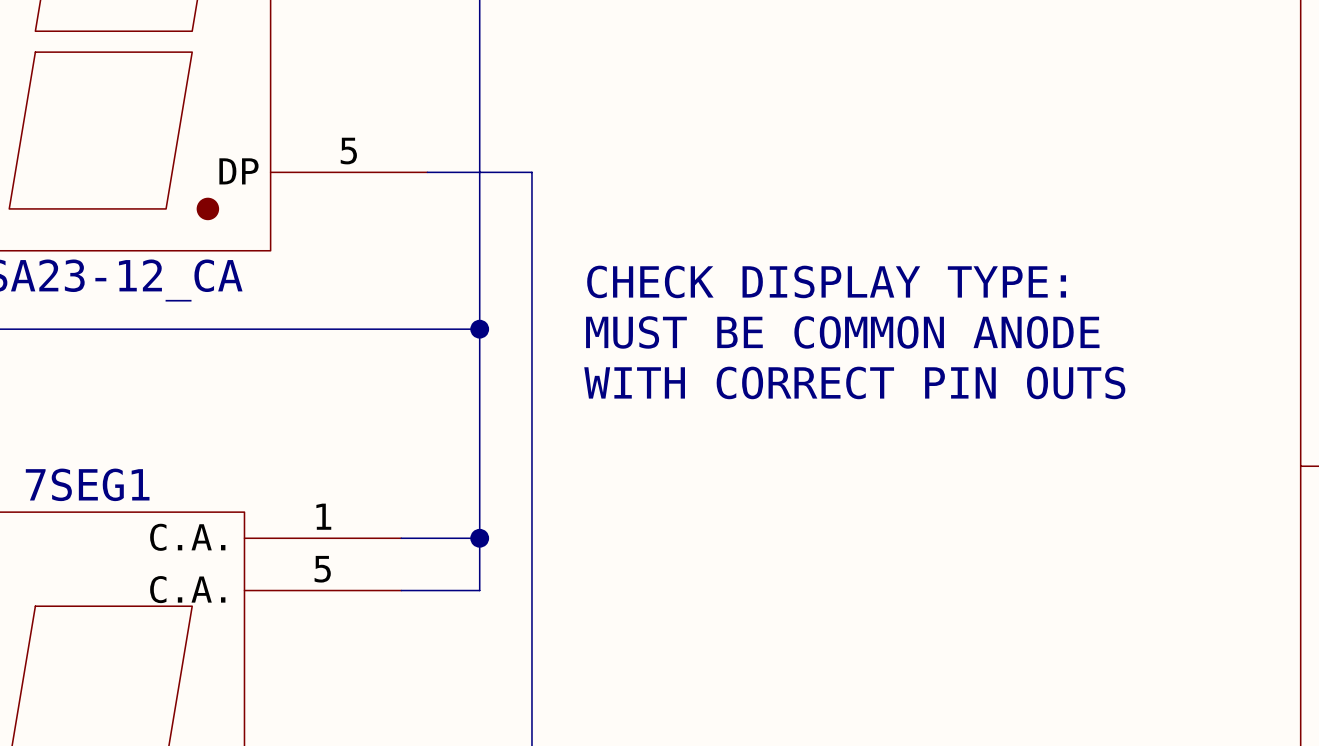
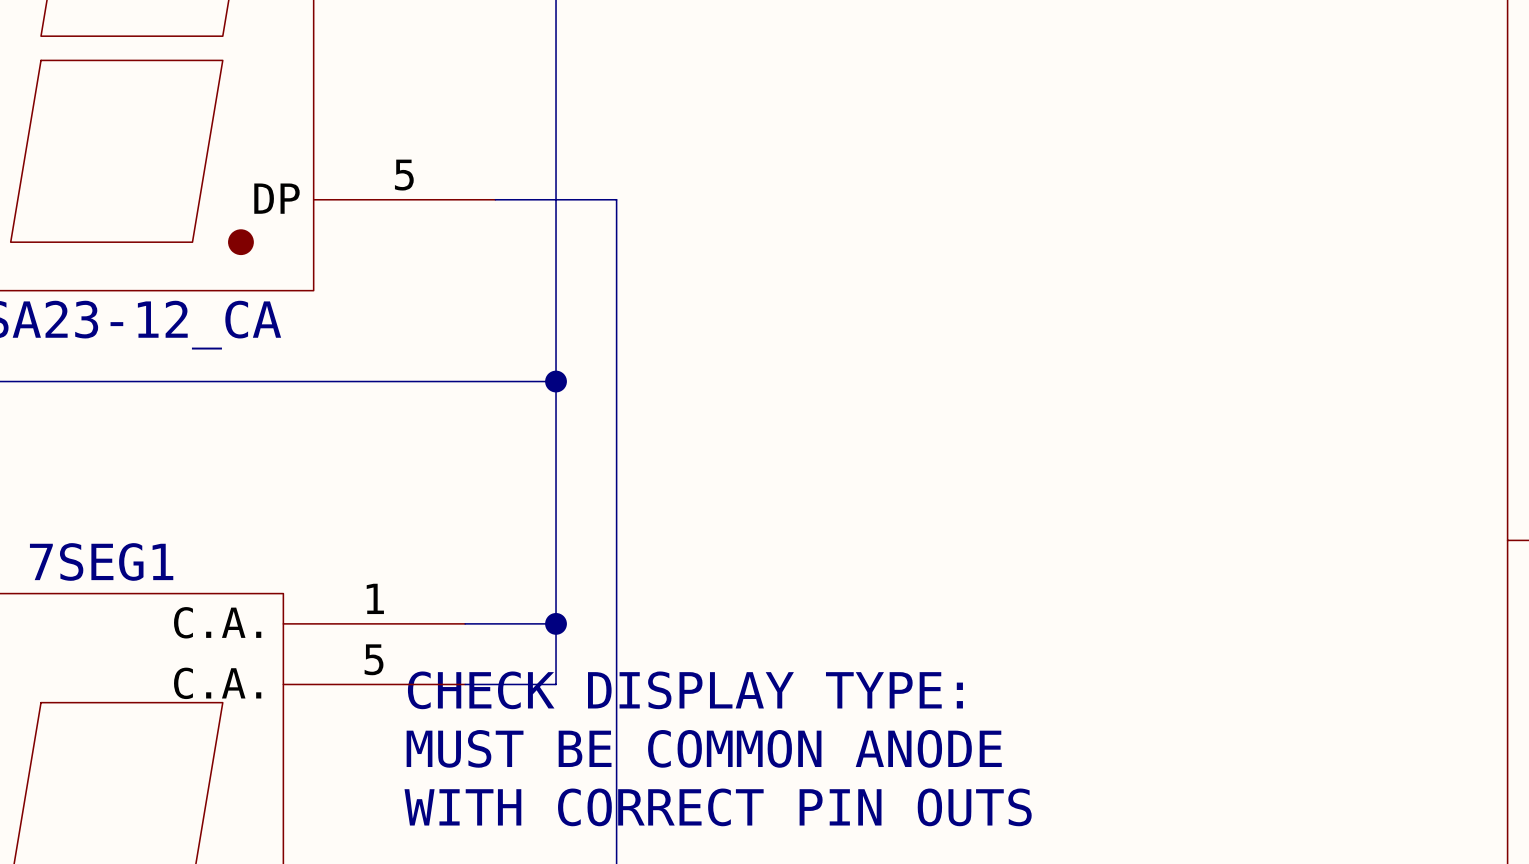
text position: CHECK DISPLAY TYPE: (826, 281) -> CHECK DISPLAY TYPE: (685, 690)
text position: MUST BE COMMON ANODE (842, 332) -> MUST BE COMMON ANODE (704, 748)
text position: WITH CORRECT PIN OUTS (854, 382) -> WITH CORRECT PIN OUTS (718, 807)

